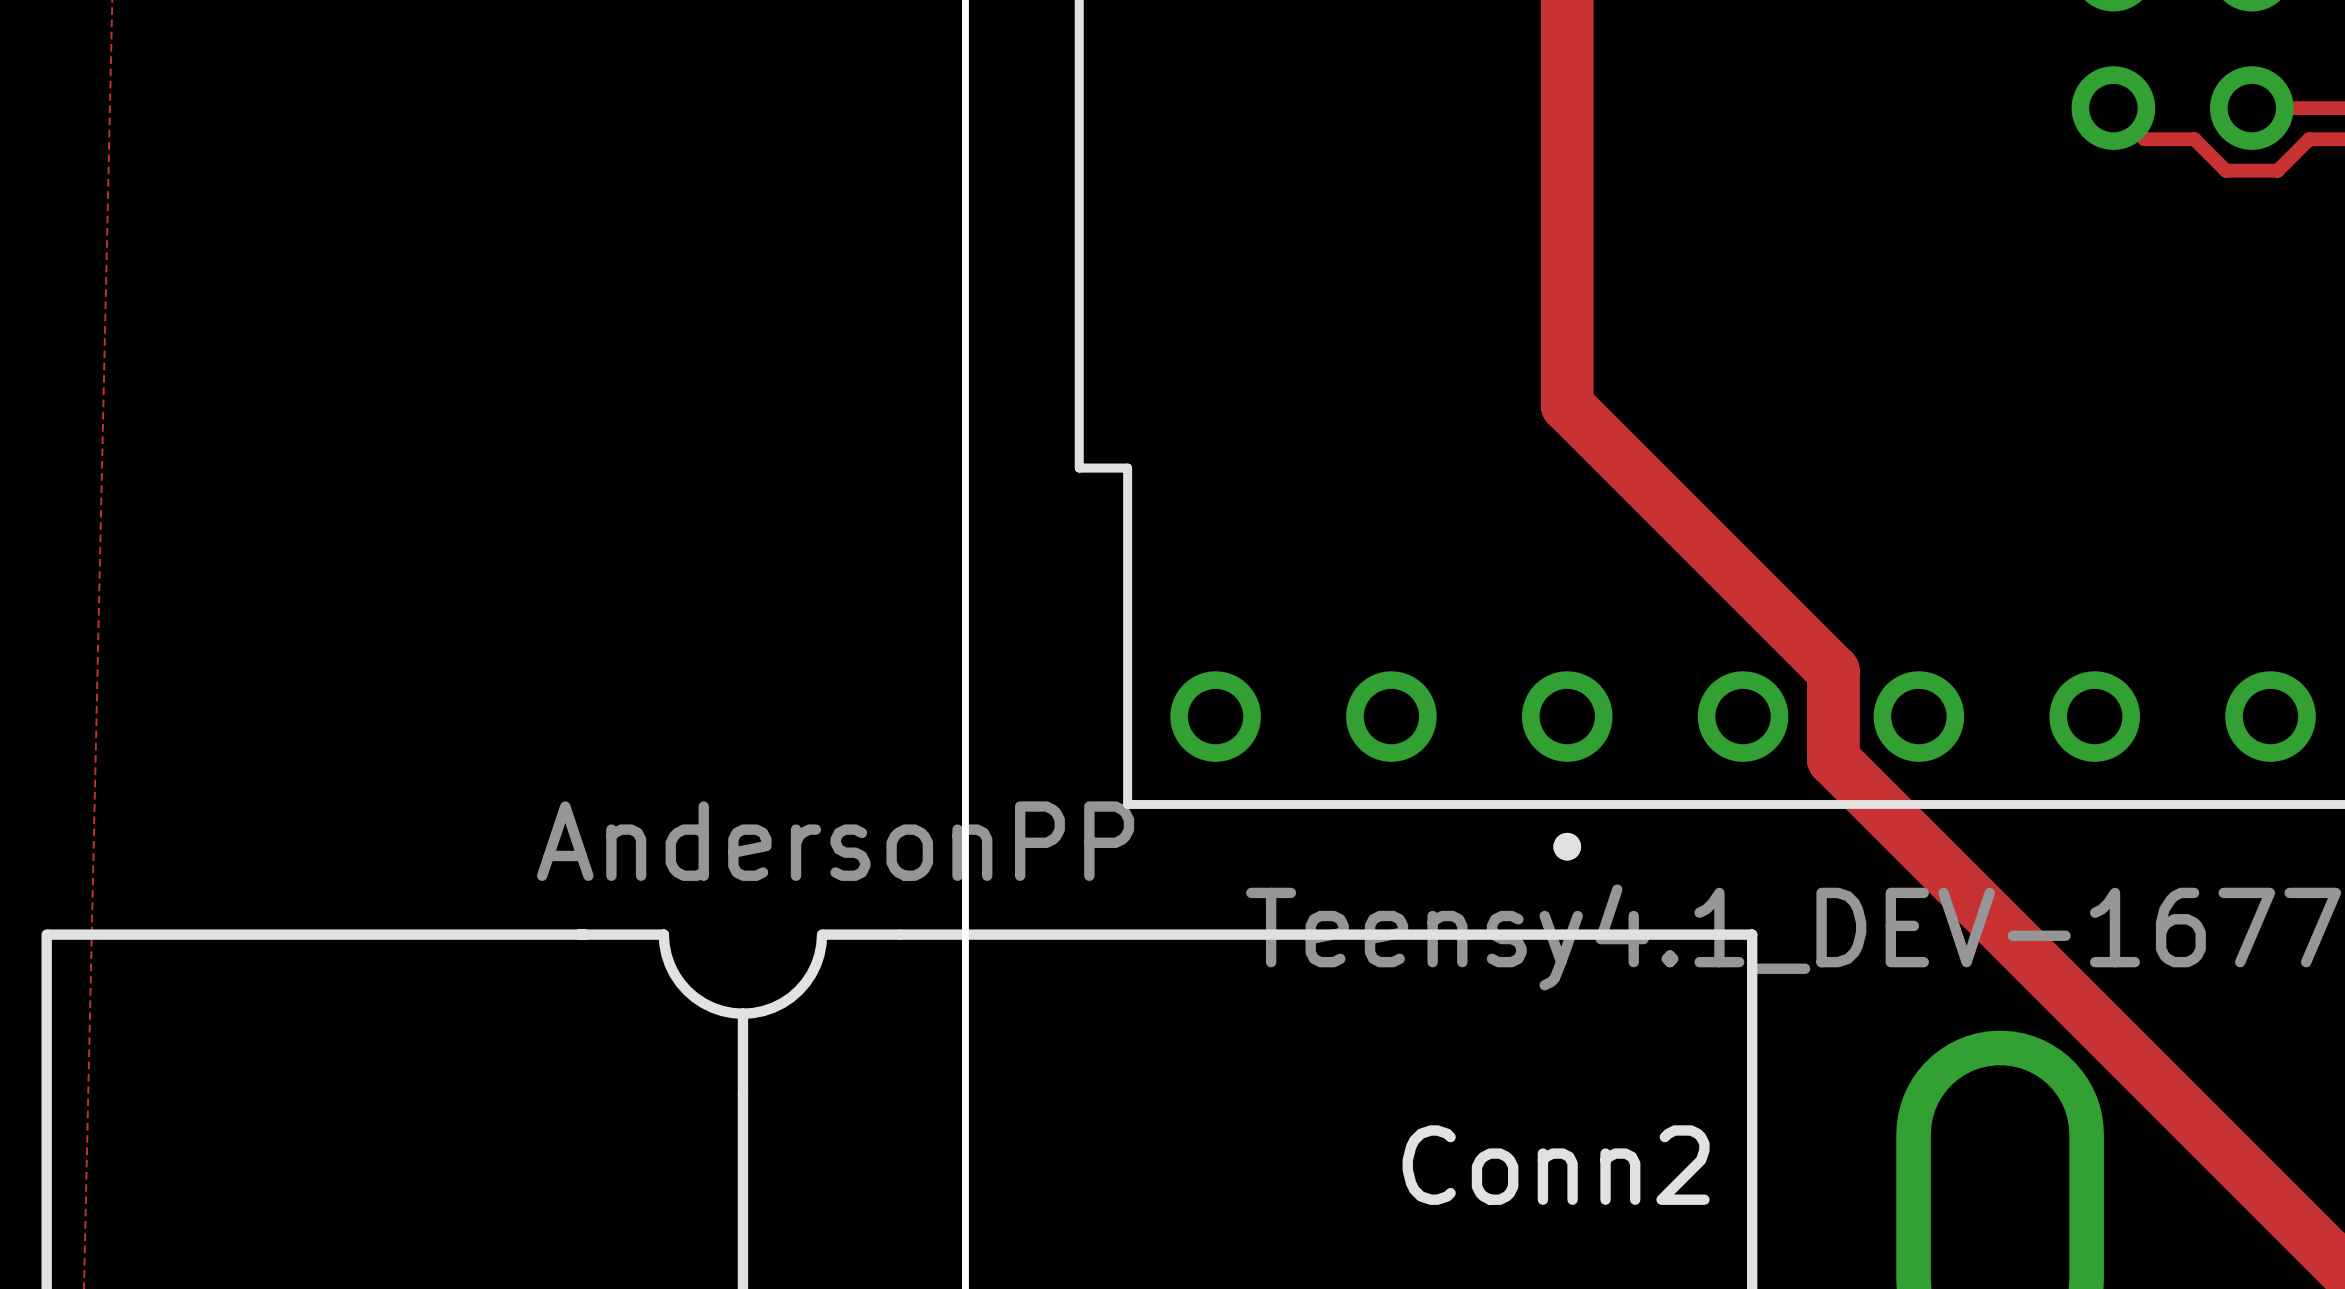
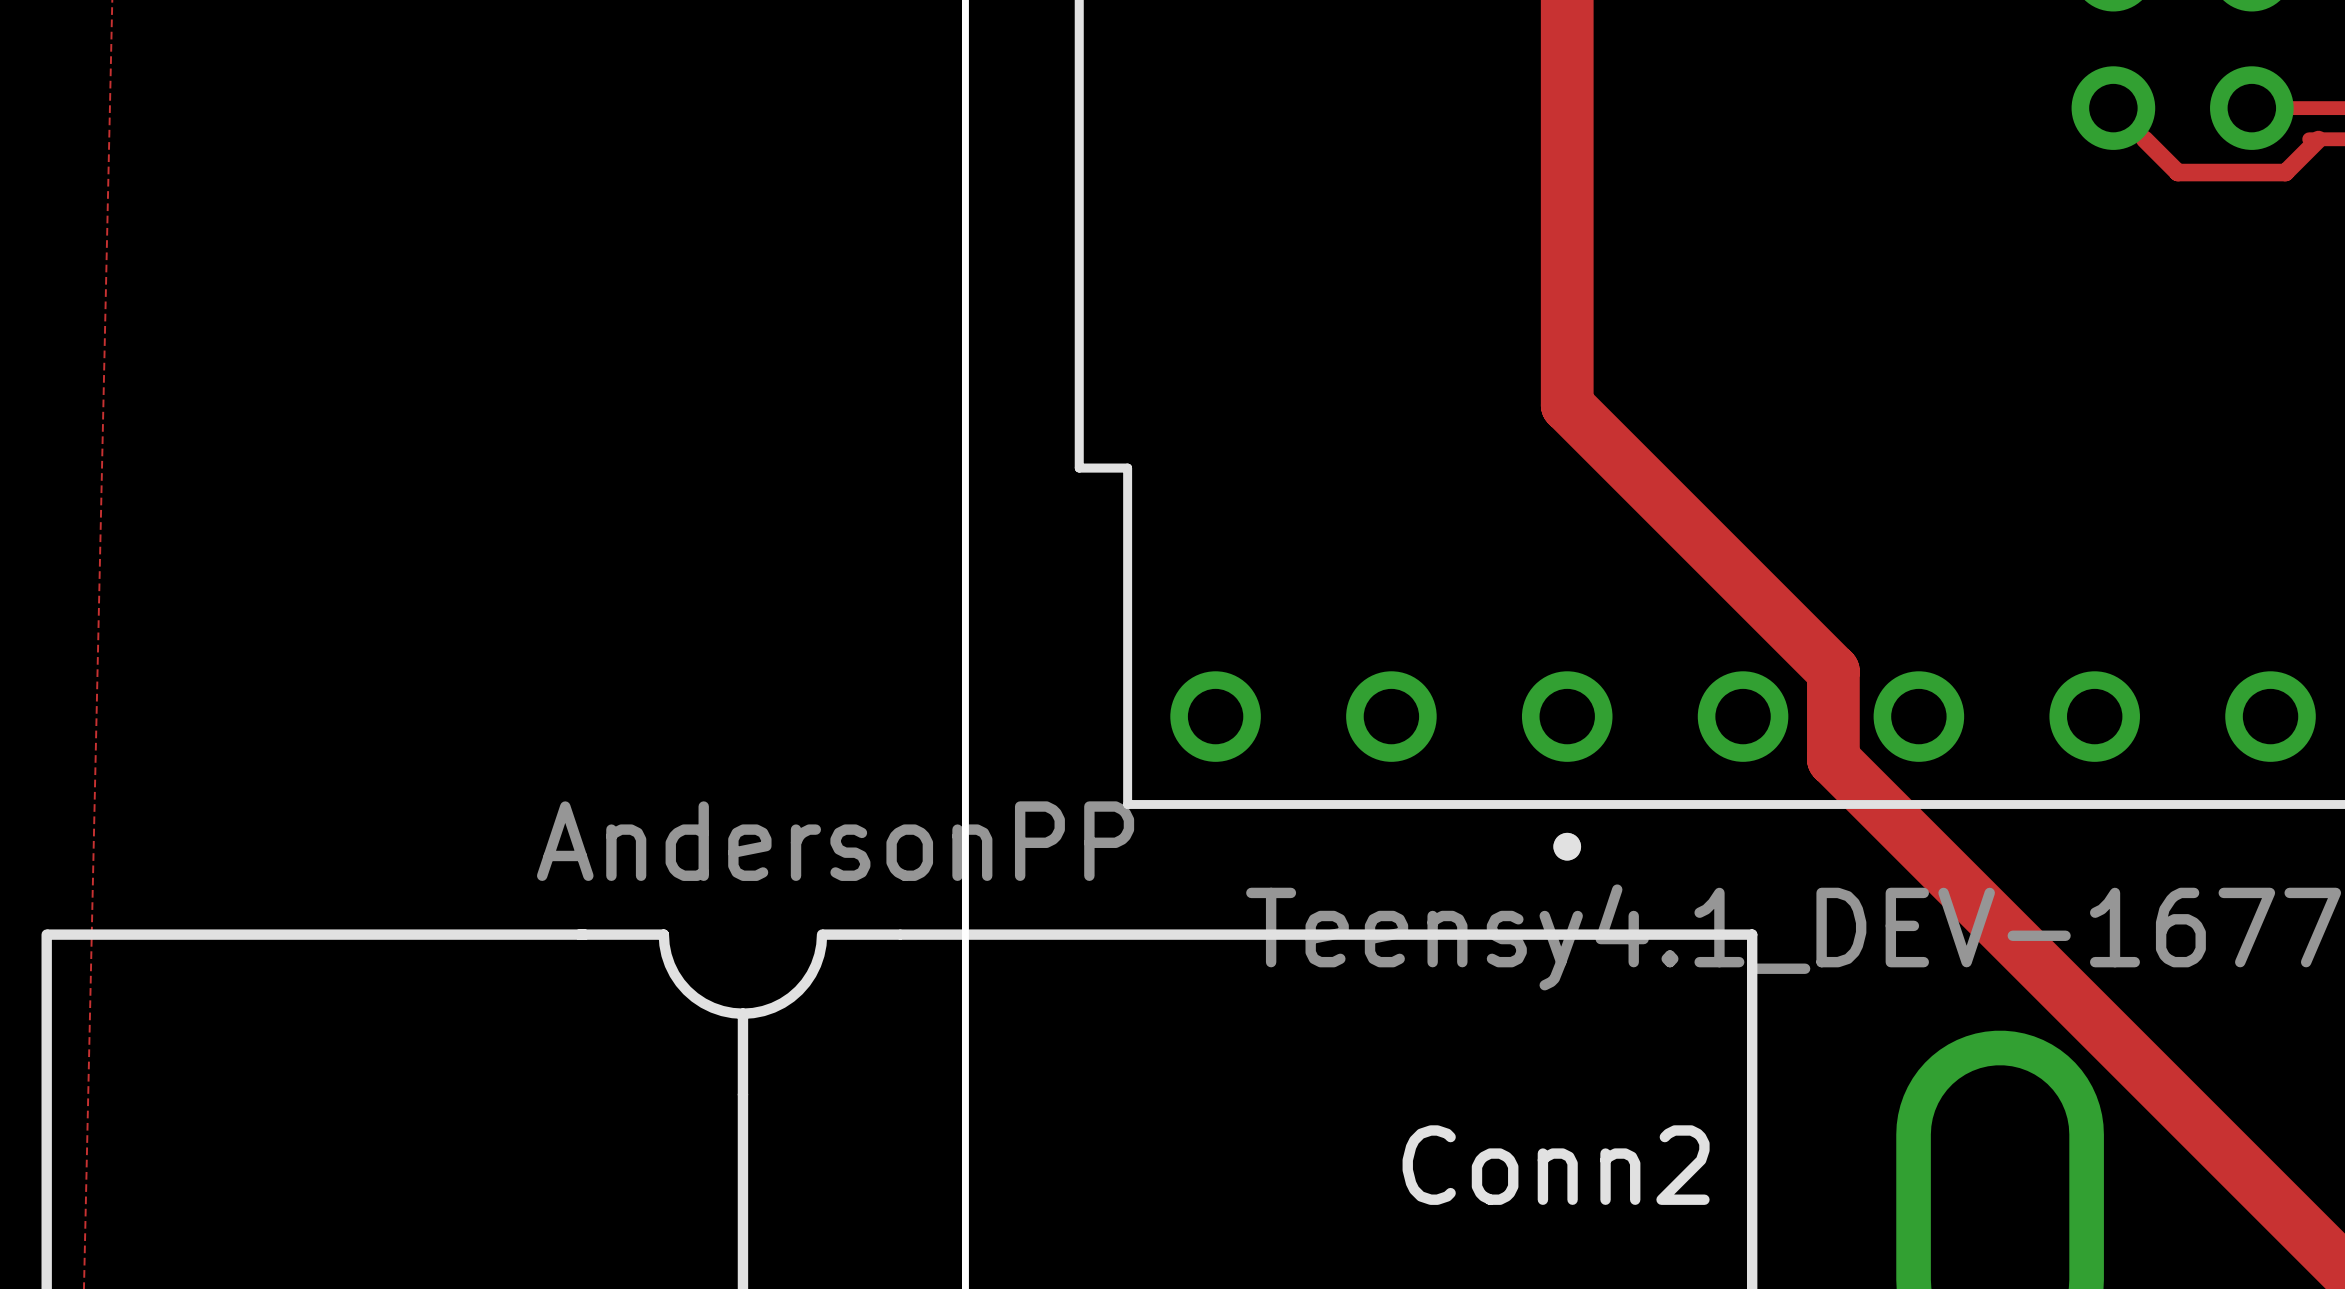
track: (2144, 139) (2194, 139) (2225, 170) (2277, 170) (2309, 139) -> (2144, 139) (2177, 172) (2285, 172) (2318, 139)

